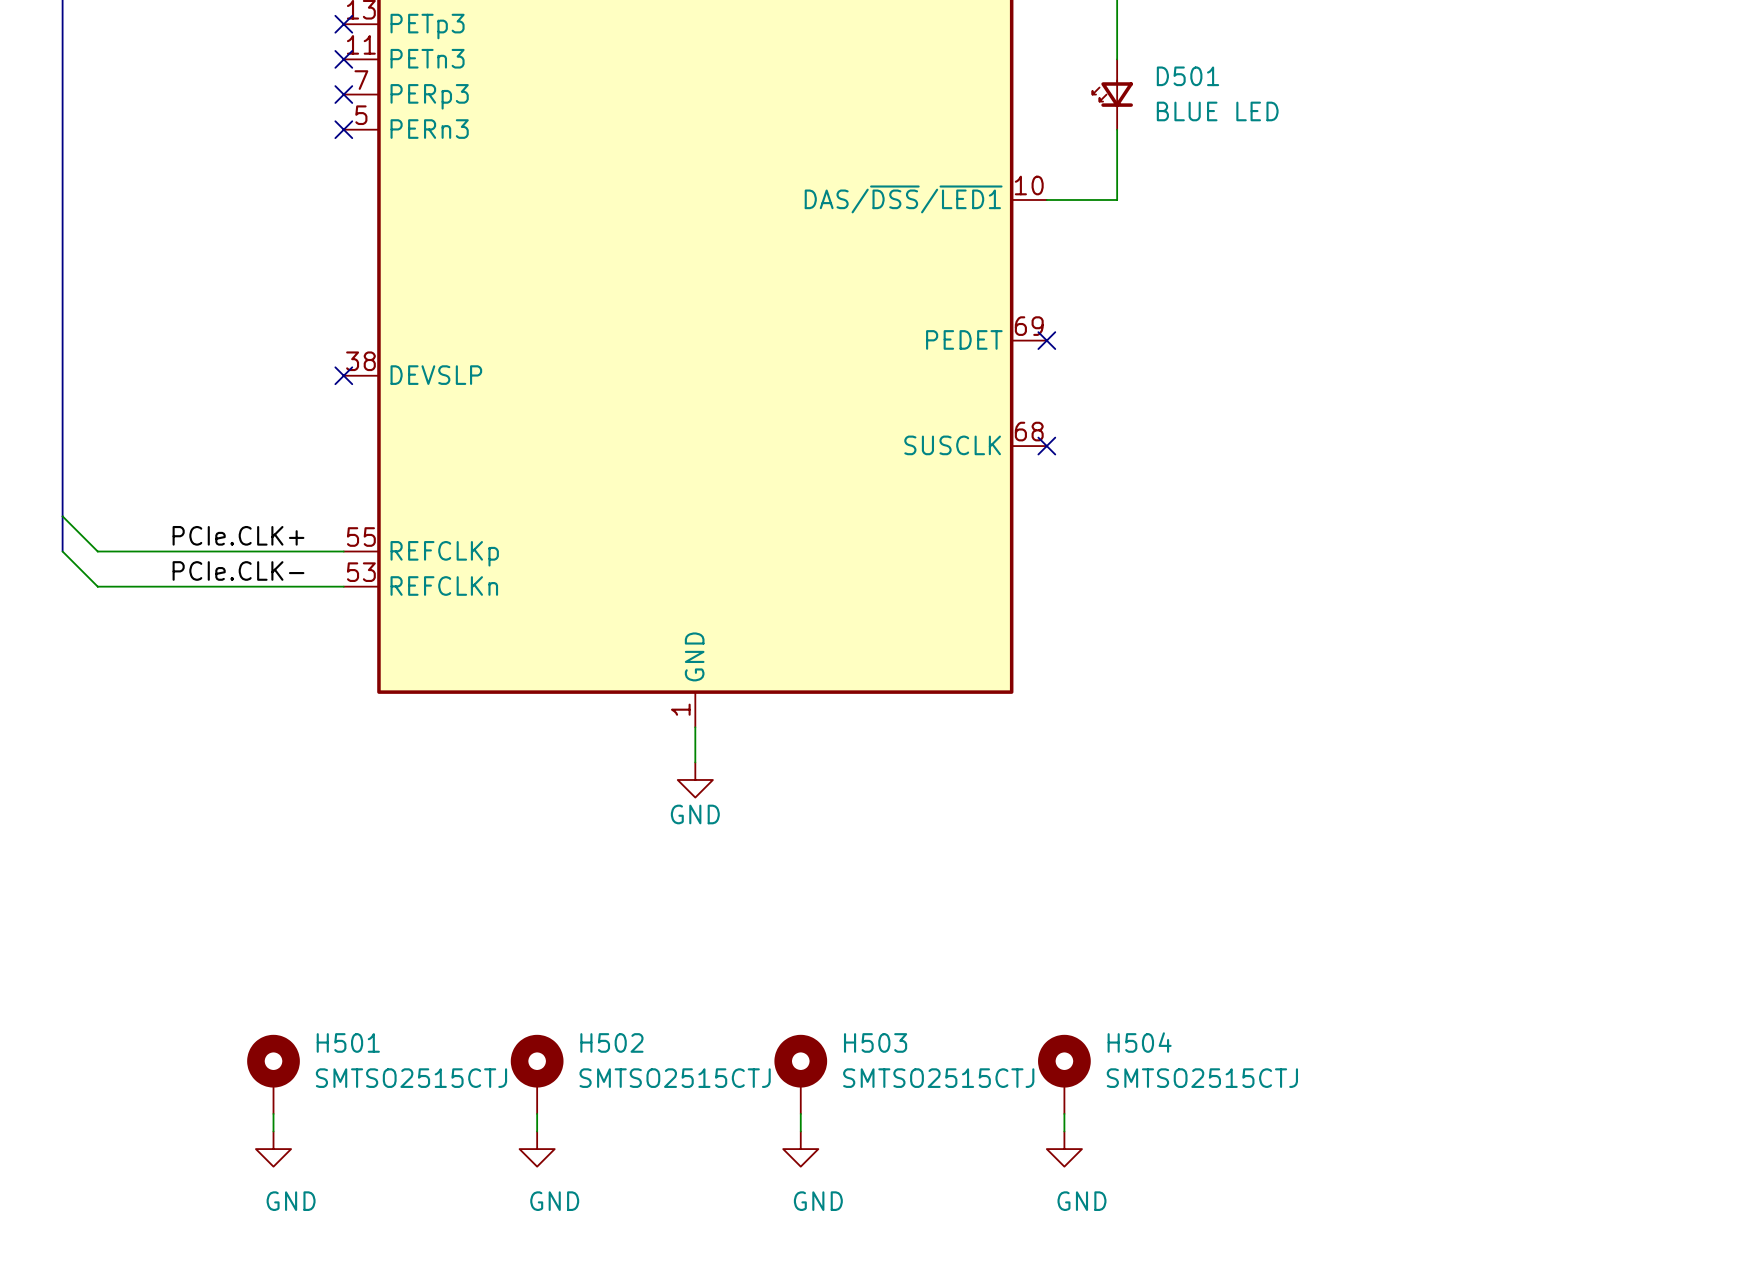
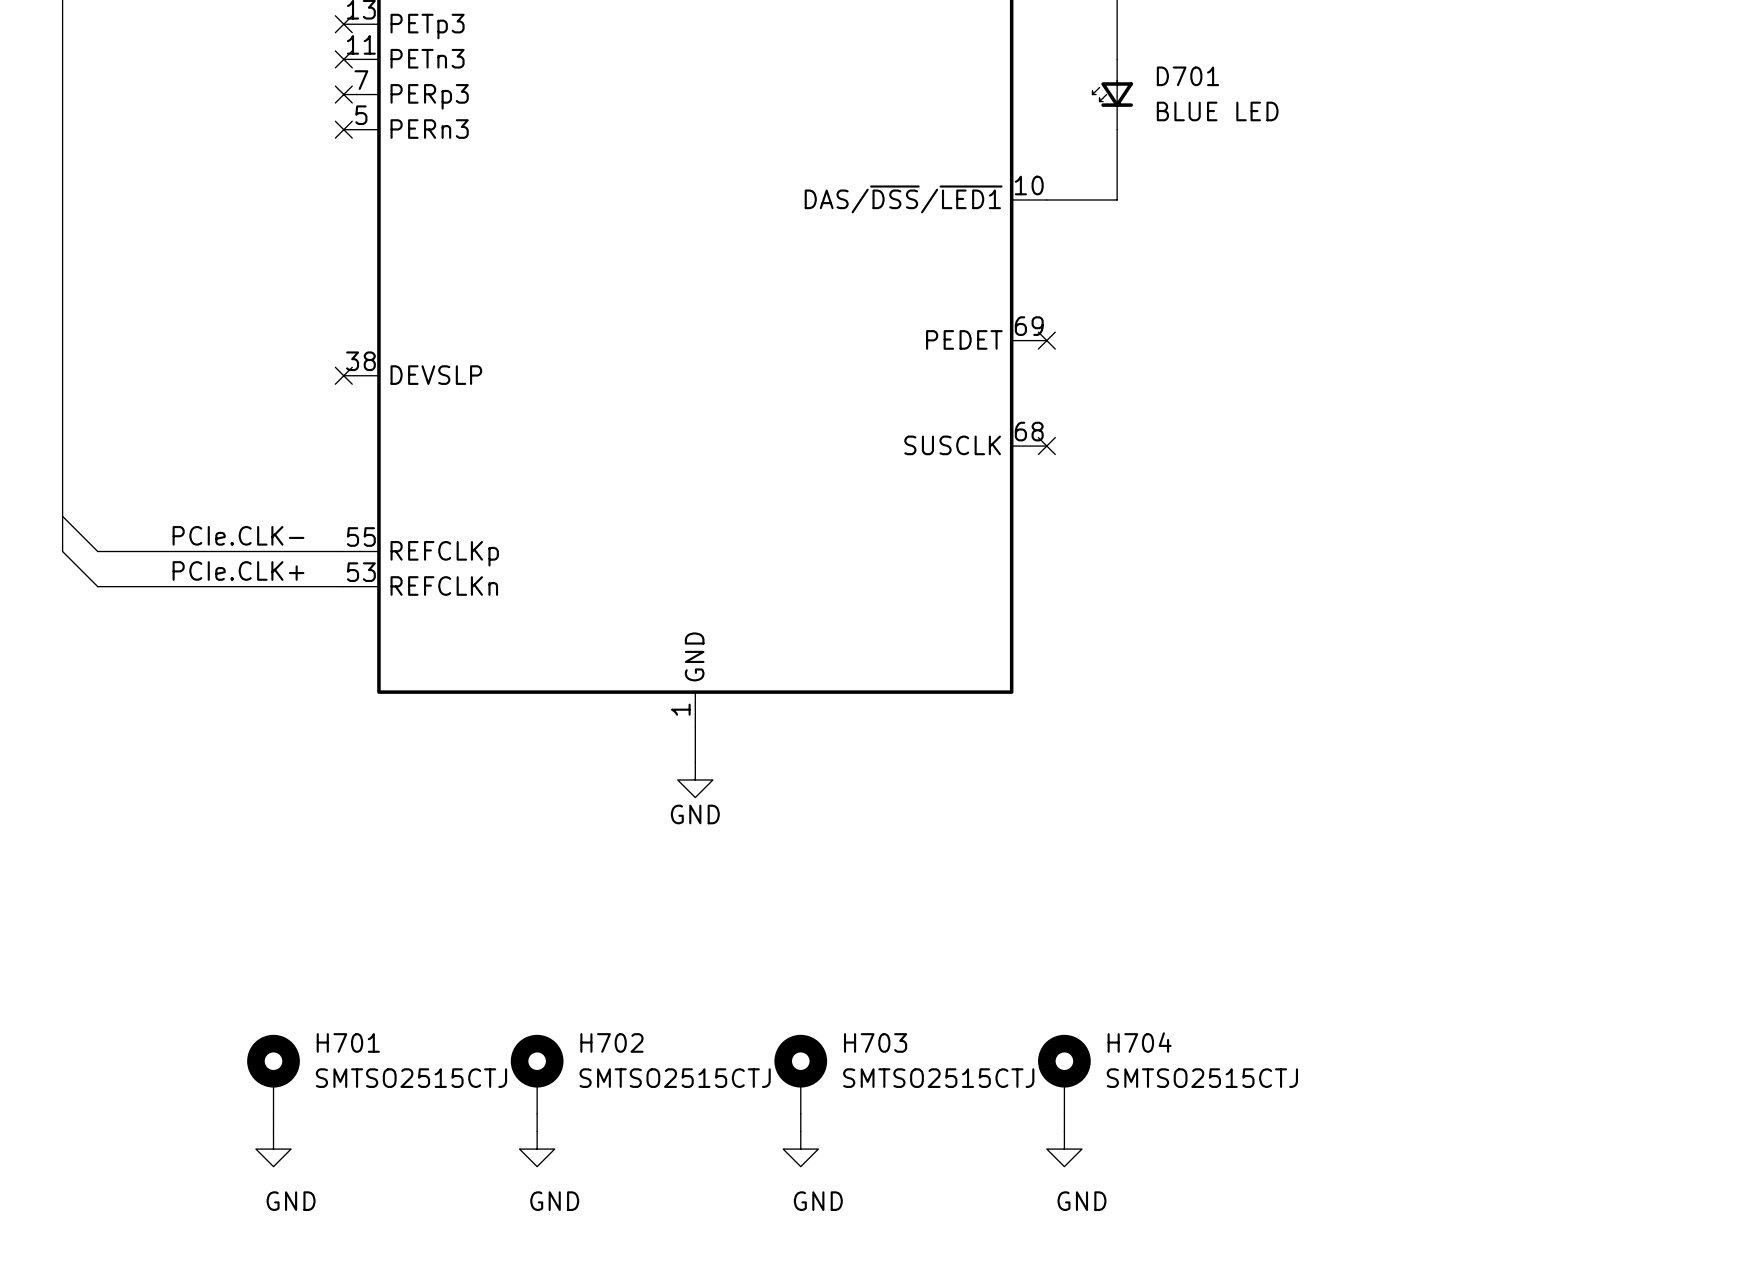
D501 name: D501 (1187, 76) -> D701 (1187, 76)
label: PCIe.CLK+ (238, 535) -> PCIe.CLK- (238, 535)
label: PCIe.CLK- (238, 570) -> PCIe.CLK+ (238, 570)
H501 name: H501 (348, 1042) -> H701 (348, 1042)
H502 name: H502 (611, 1042) -> H702 (611, 1042)
H503 name: H503 (875, 1042) -> H703 (875, 1042)
H504 name: H504 (1139, 1042) -> H704 (1139, 1042)

